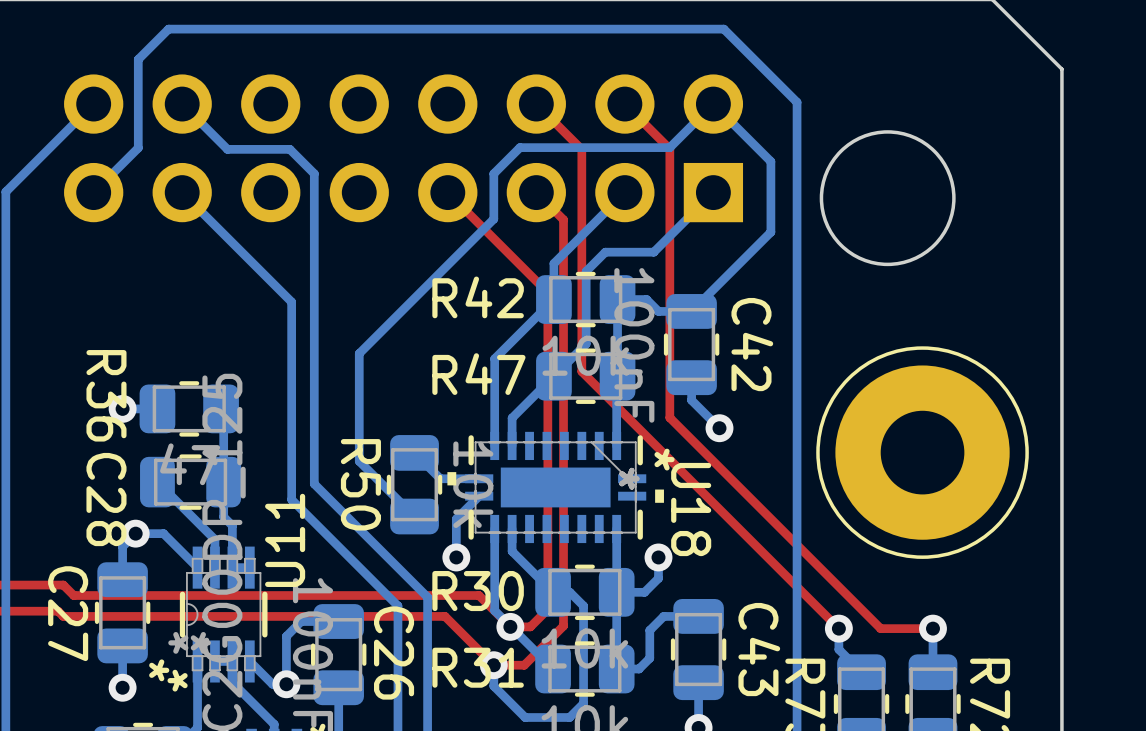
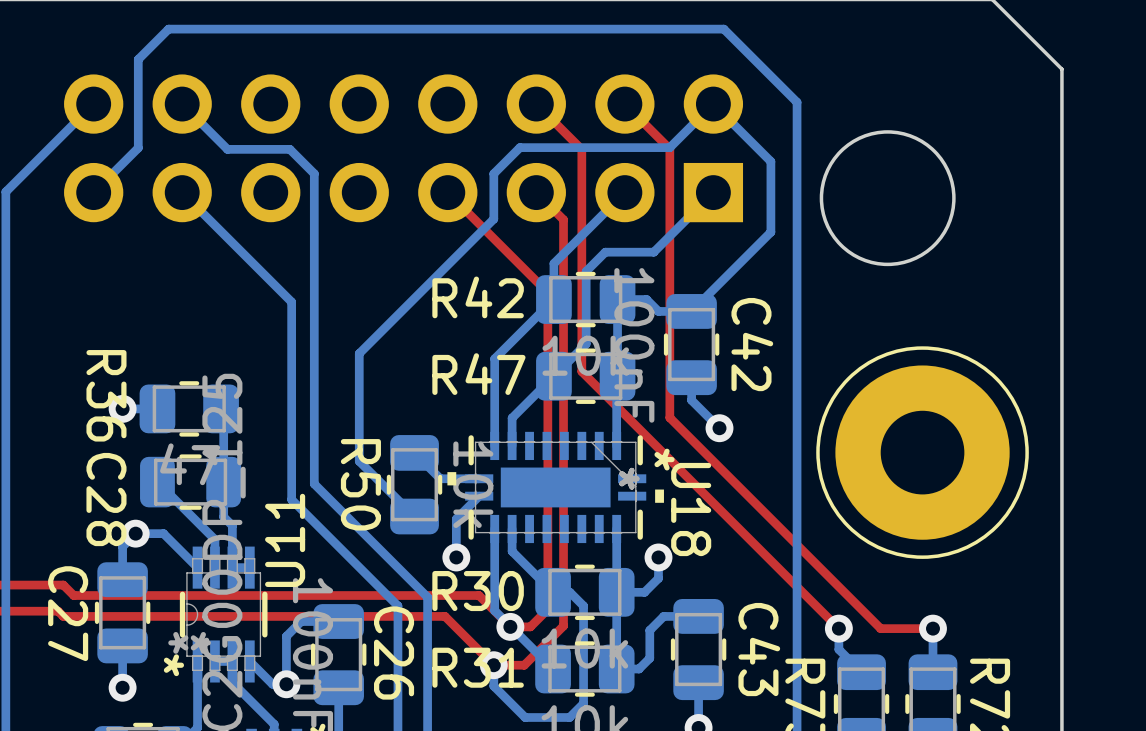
U11 text: * (159, 670) -> none
U11 text rotation: 0° (177, 680) -> 180° (173, 665)

